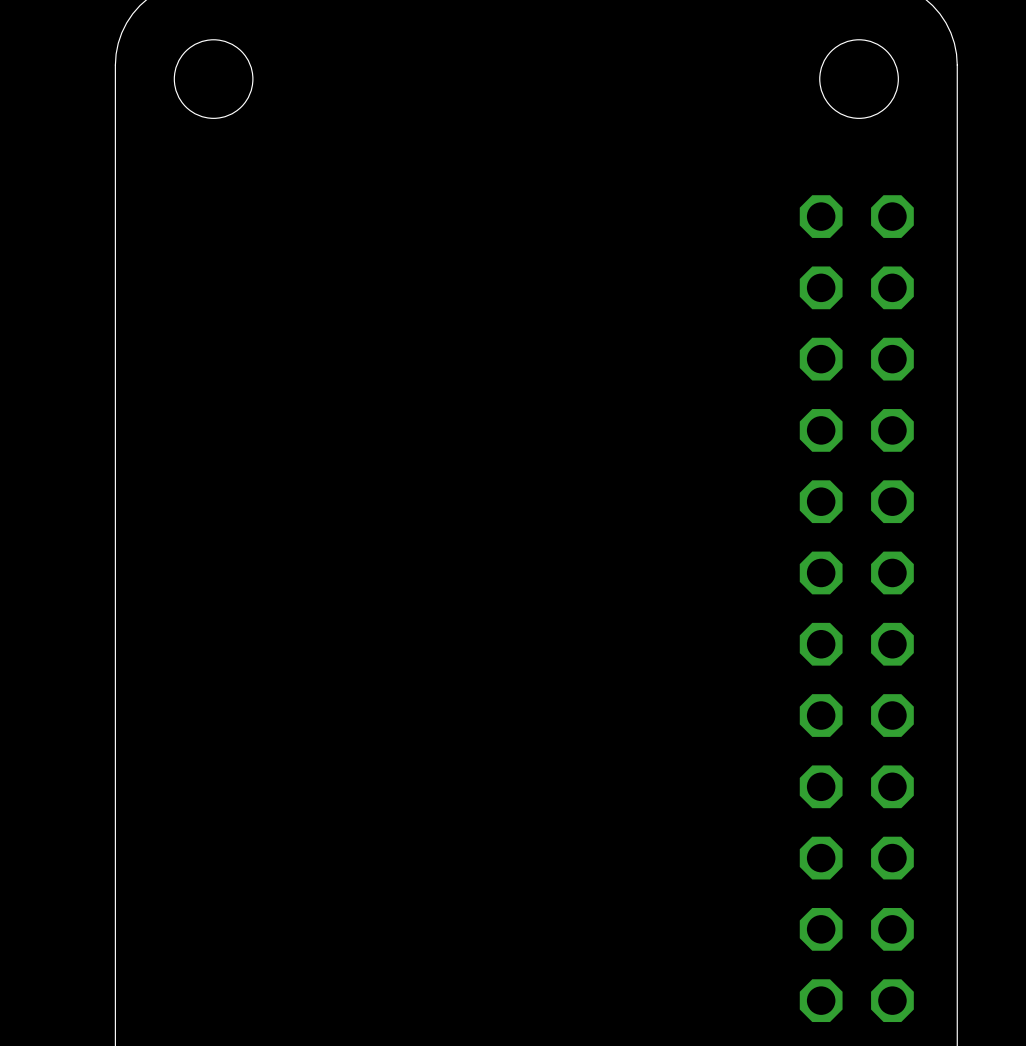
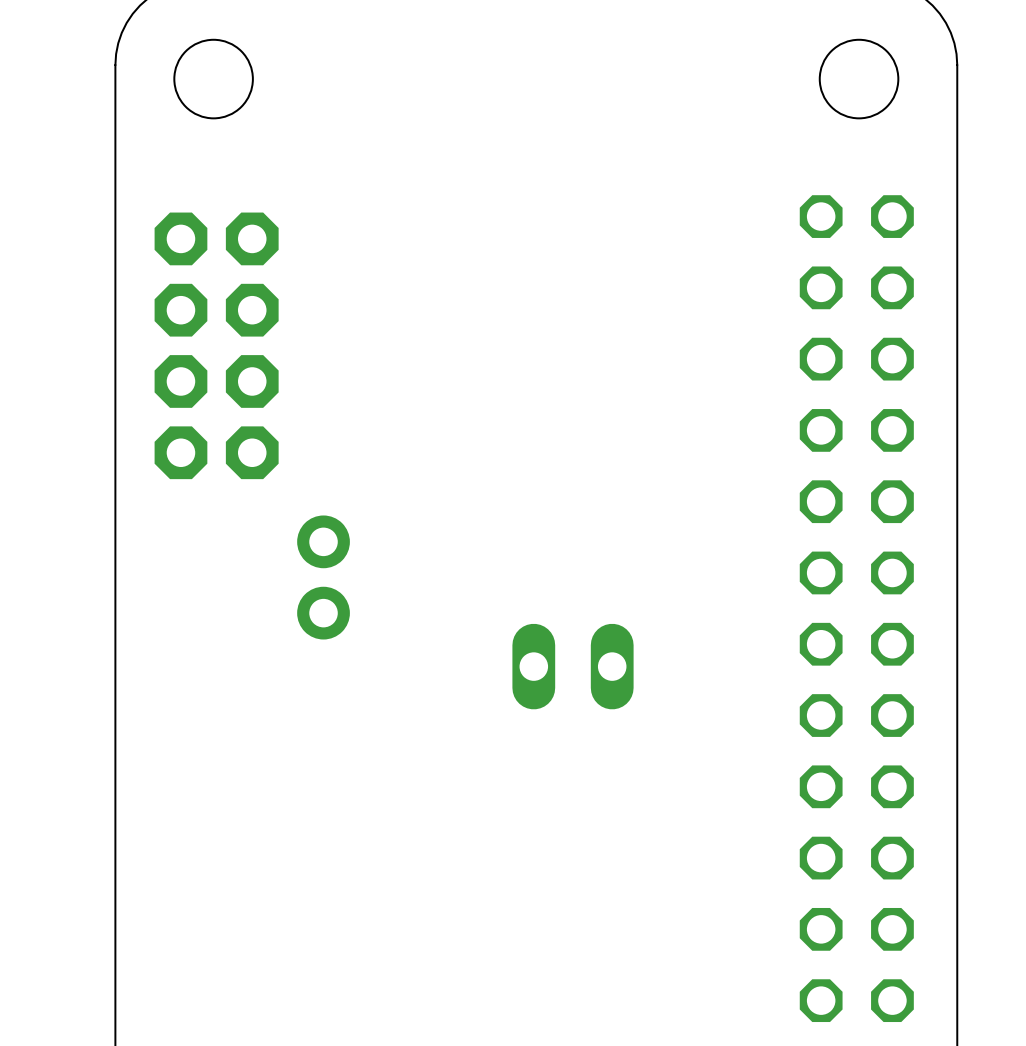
part: none -> (216, 345)
part: none -> (323, 577)
part: none -> (573, 666)

